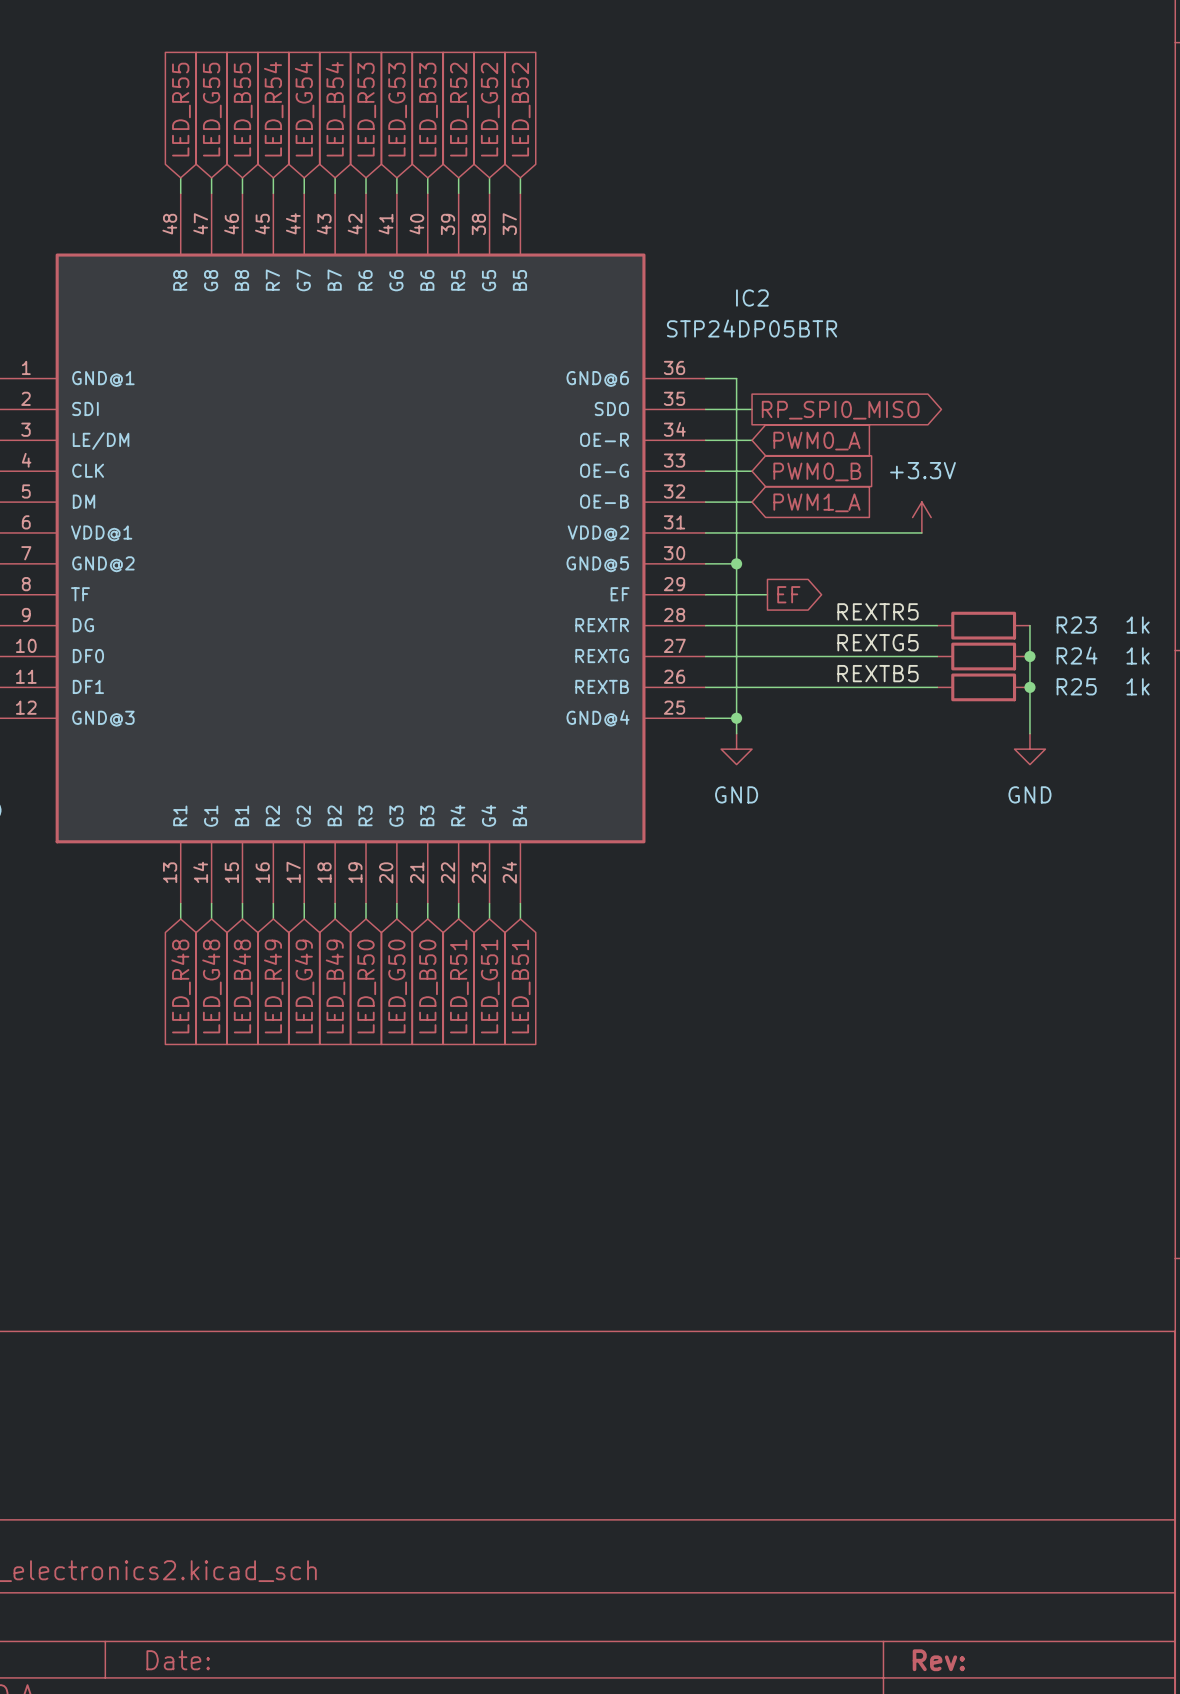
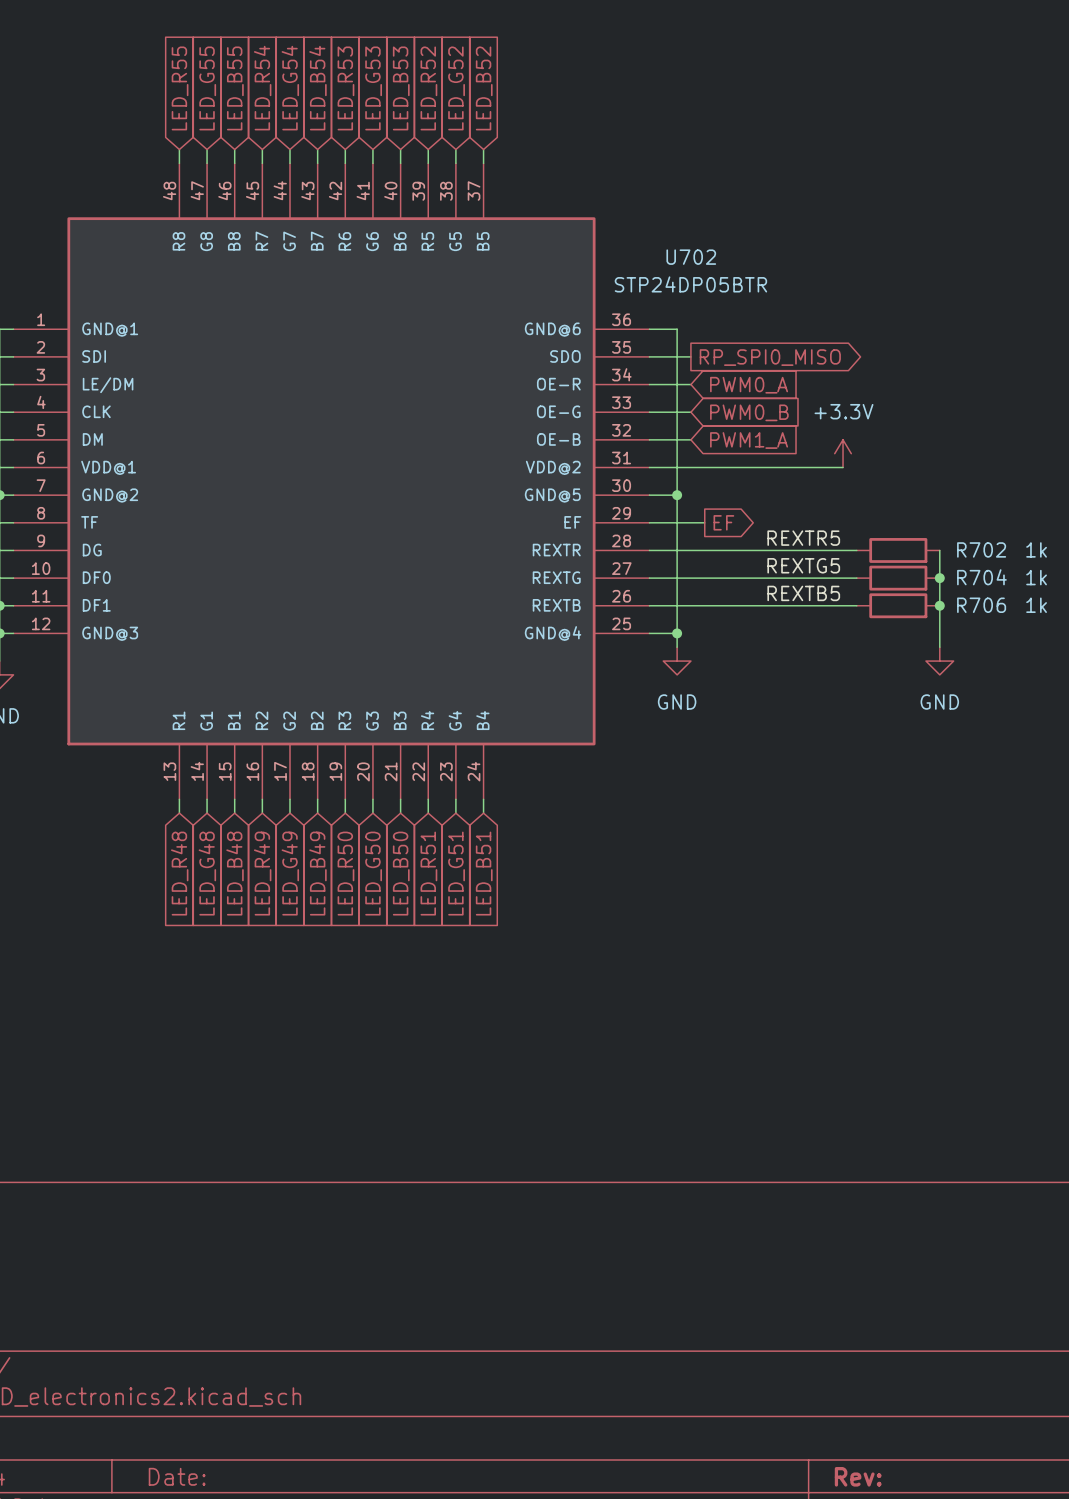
IC2 name: IC2 (752, 298) -> U702 (691, 257)
R23 name: R23 (1076, 625) -> R702 (981, 549)
R24 name: R24 (1077, 655) -> R704 (981, 577)
R25 name: R25 (1076, 686) -> R706 (981, 605)

